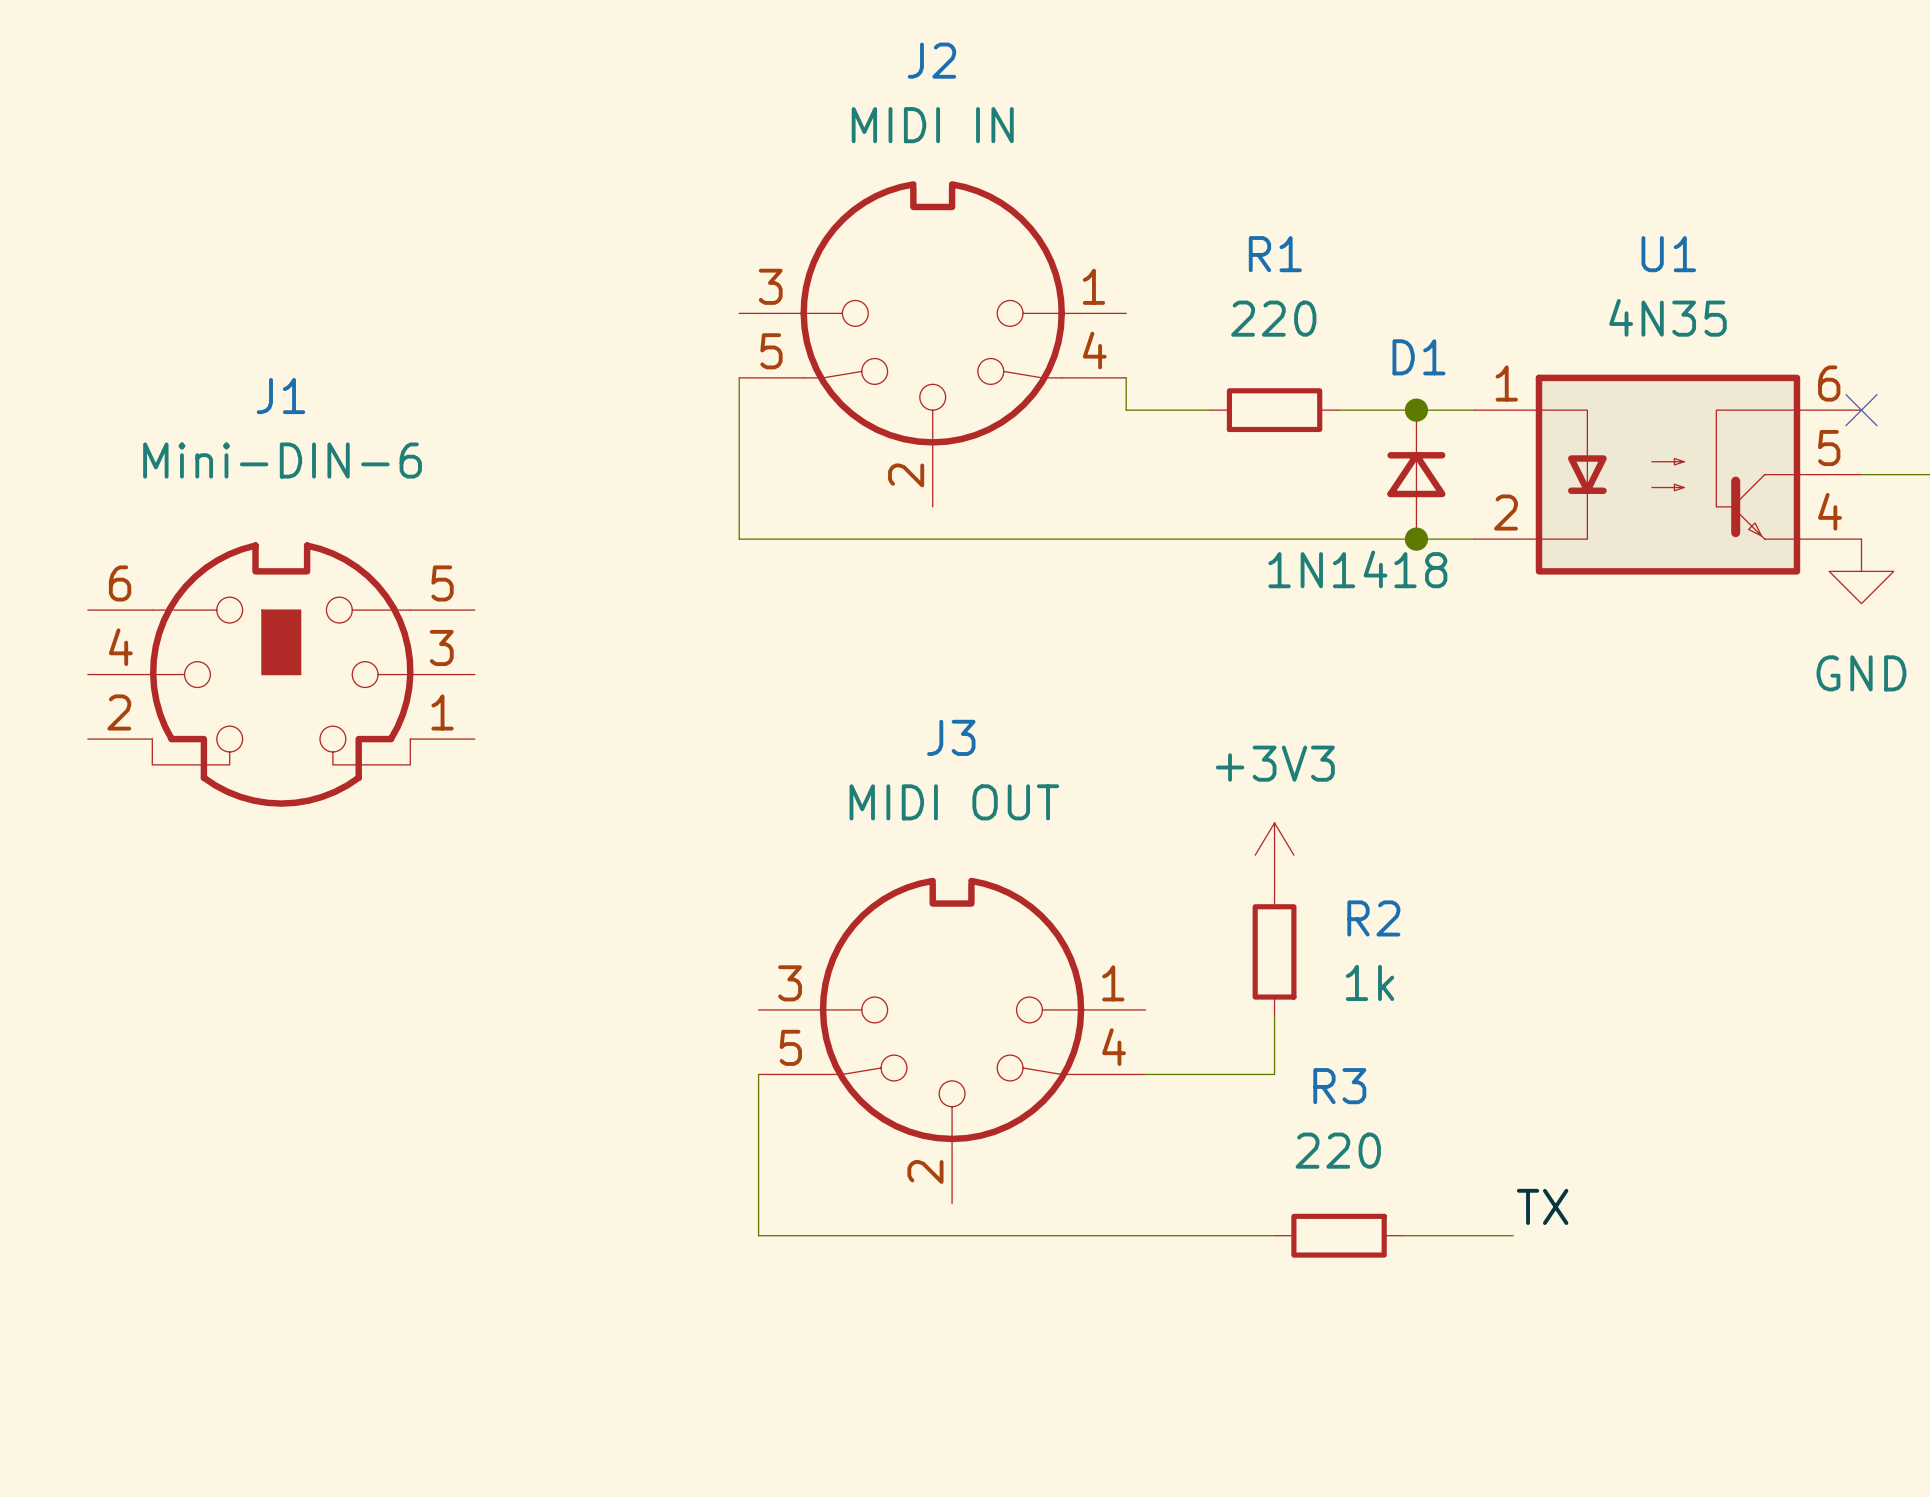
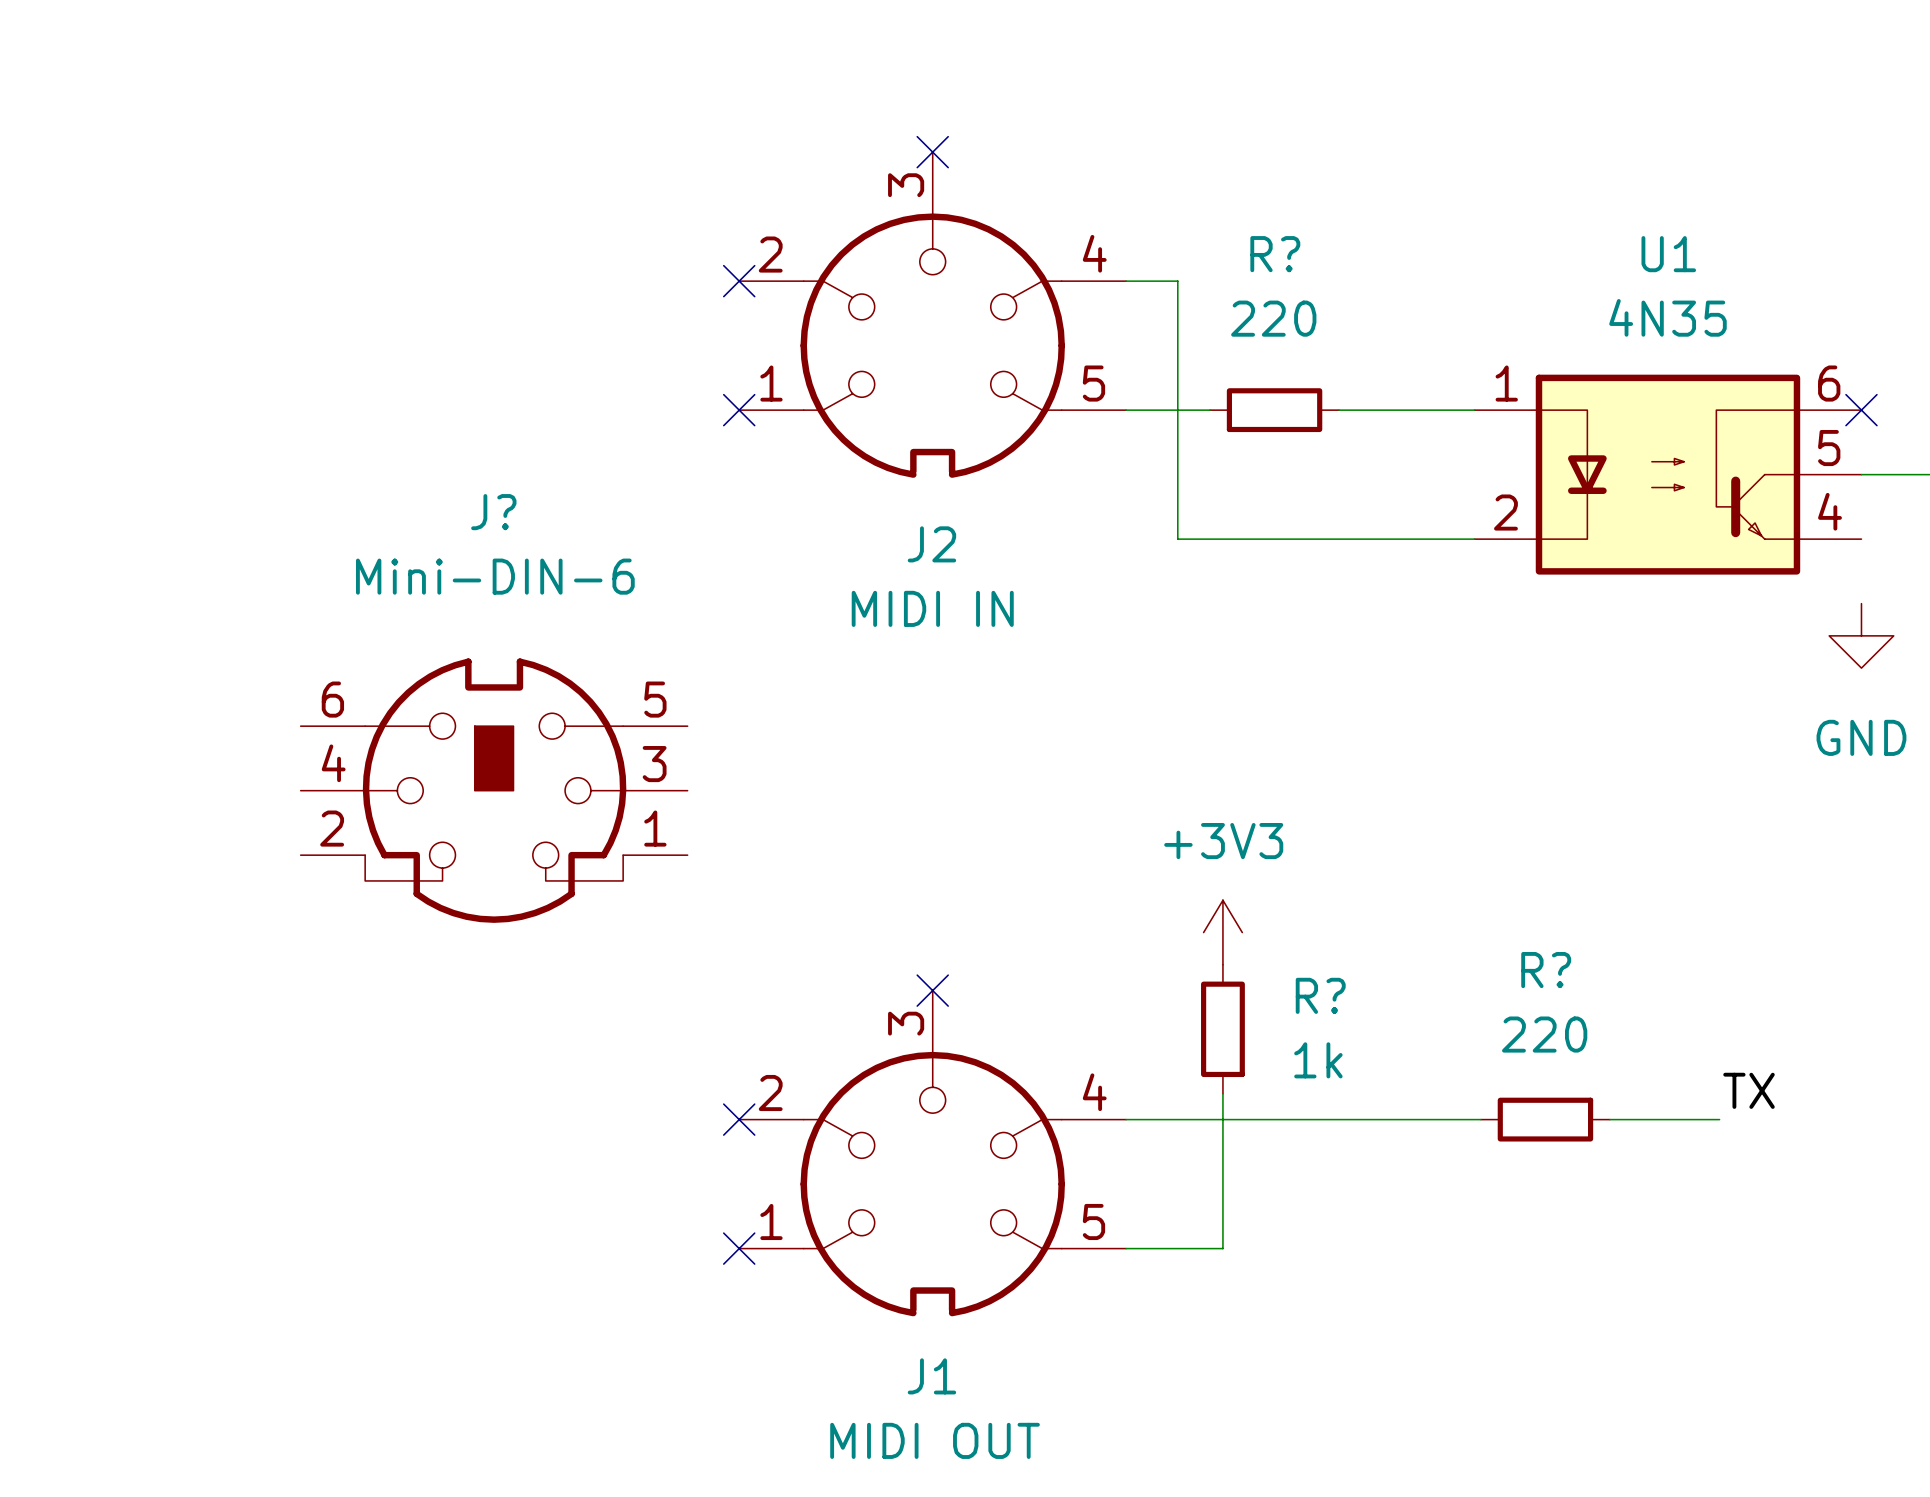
J2 name position: J2 (931, 60) -> J2 (931, 544)
J2 value position: MIDI IN (932, 125) -> MIDI IN (932, 608)
no-connect mark: none -> (932, 152)
J2 symbol: [739, 181, 1127, 507] -> [739, 152, 1127, 478]
R1 name: R1 (1275, 254) -> R? (1275, 254)
no-connect mark: none -> (739, 281)
wire: (739, 377) (739, 539) (1177, 539) -> (1126, 281) (1177, 281) (1177, 539)
wire: (1126, 377) (1126, 410) -> none
J1 name position: J1 (280, 396) -> J1 (931, 1376)
no-connect mark: none -> (739, 410)
junction: (1416, 410) -> none
J1 value: Mini-DIN-6 (282, 460) -> MIDI OUT (935, 1440)
D1: 1N1418 (1416, 474) -> none
junction: (1416, 539) -> none
J1 symbol: [87, 542, 475, 807] -> [739, 990, 1127, 1317]
power symbol position: GND (1861, 571) -> GND (1861, 635)
J?: none -> Mini-DIN-6 (494, 790)
power symbol position: +3V3 (1274, 855) -> +3V3 (1222, 932)
R2: 1k (1274, 951) -> none
no-connect mark: none -> (932, 990)
wire: (1274, 1016) (1274, 1074) (1145, 1074) -> none
R?: none -> 1k (1222, 1029)
J3: MIDI OUT (952, 1040) -> none
wire: (758, 1074) (758, 1235) (1274, 1235) -> none
wire: none -> (1222, 1093) (1222, 1248) (1126, 1248)
no-connect mark: none -> (739, 1119)
wire: none -> (1126, 1119) (1480, 1119)
R?: none -> 220 (1545, 1119)
label position: TX (1542, 1206) -> TX (1749, 1090)
R3: 220 (1339, 1235) -> none
wire: (1403, 1235) (1513, 1235) -> (1609, 1119) (1719, 1119)
no-connect mark: none -> (739, 1248)

